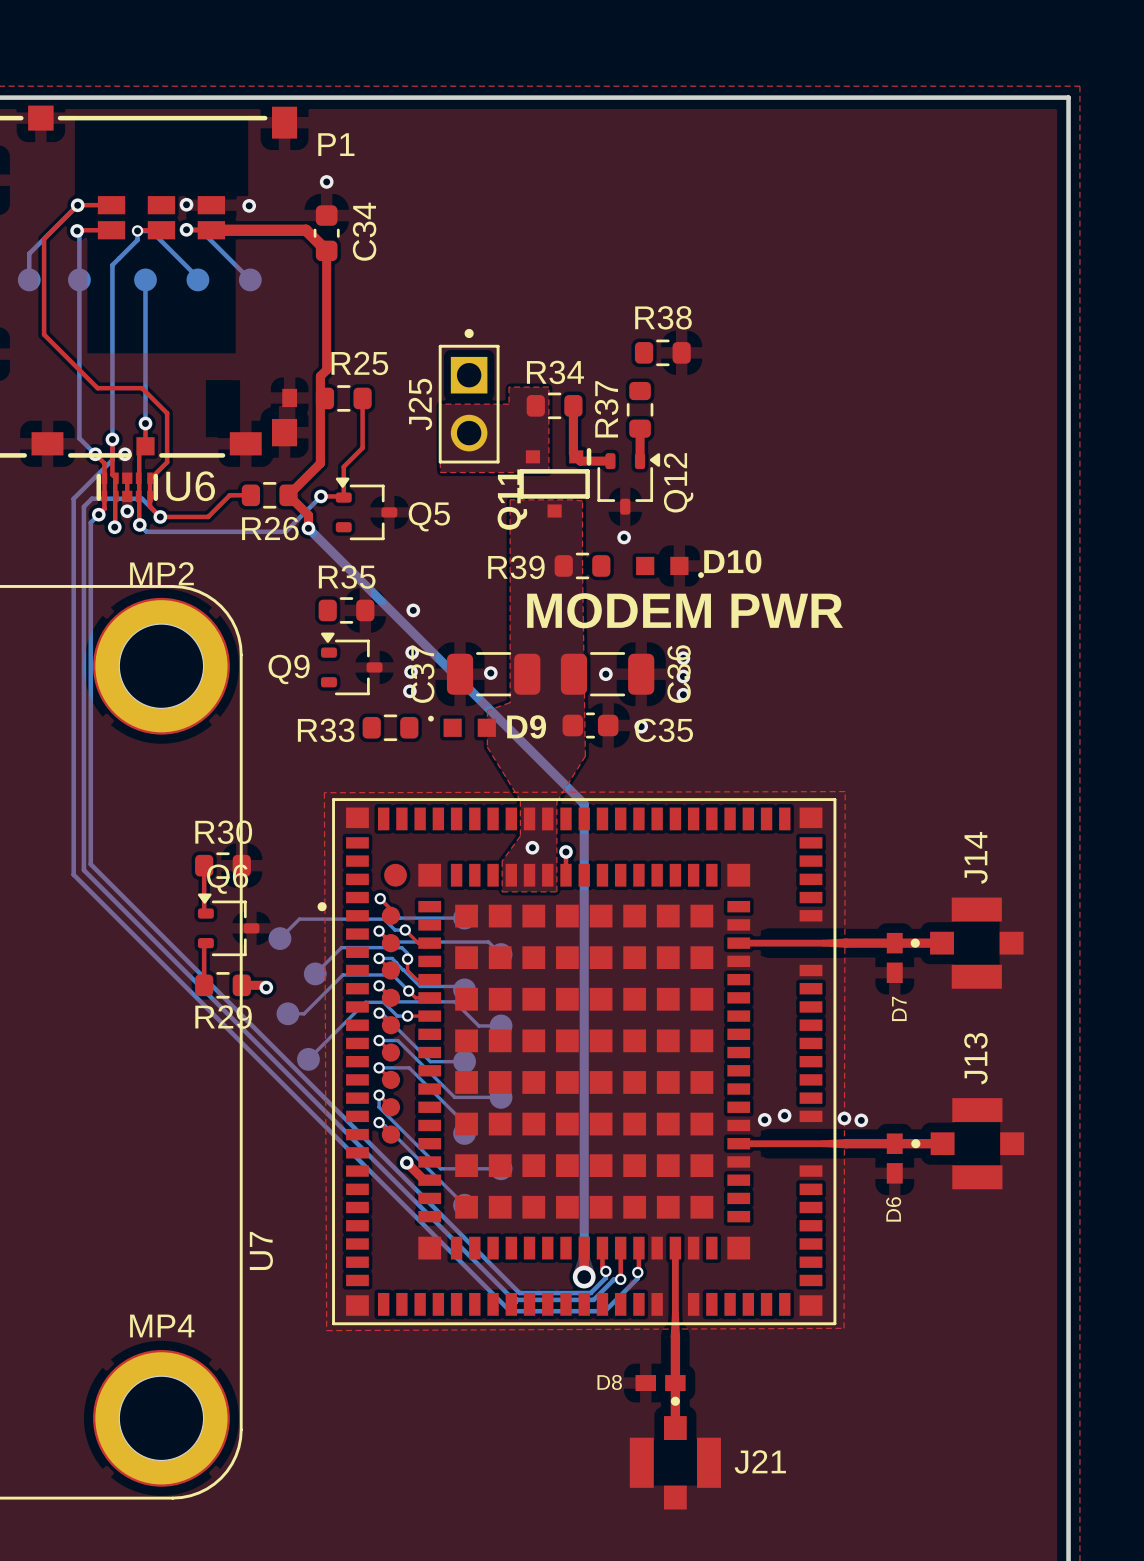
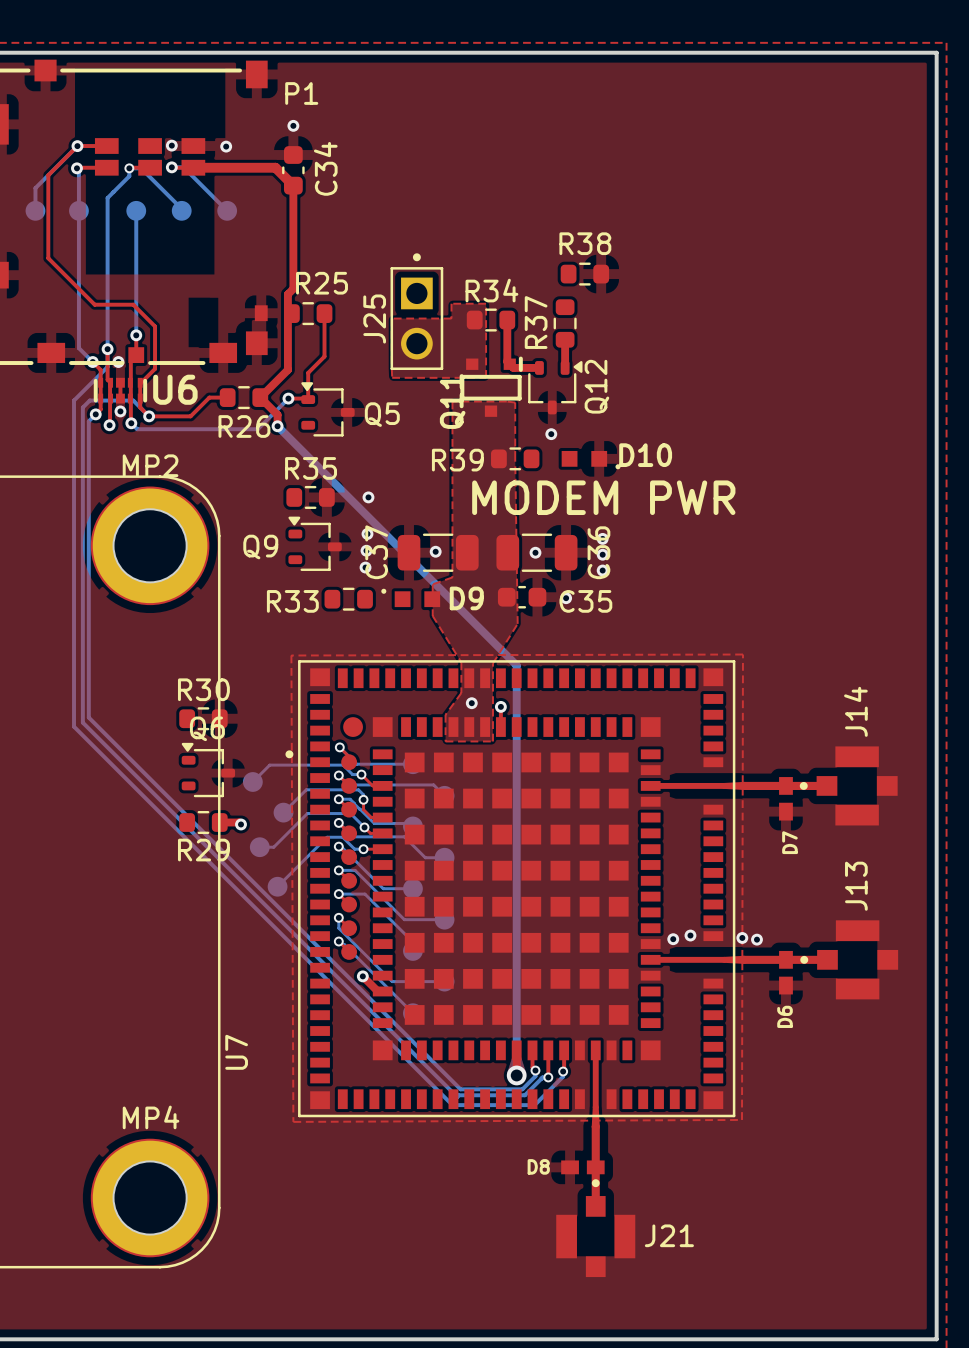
top track: (204, 865) (204, 911) (205, 913) -> none
top track: (205, 943) (204, 944) (204, 985) -> none

